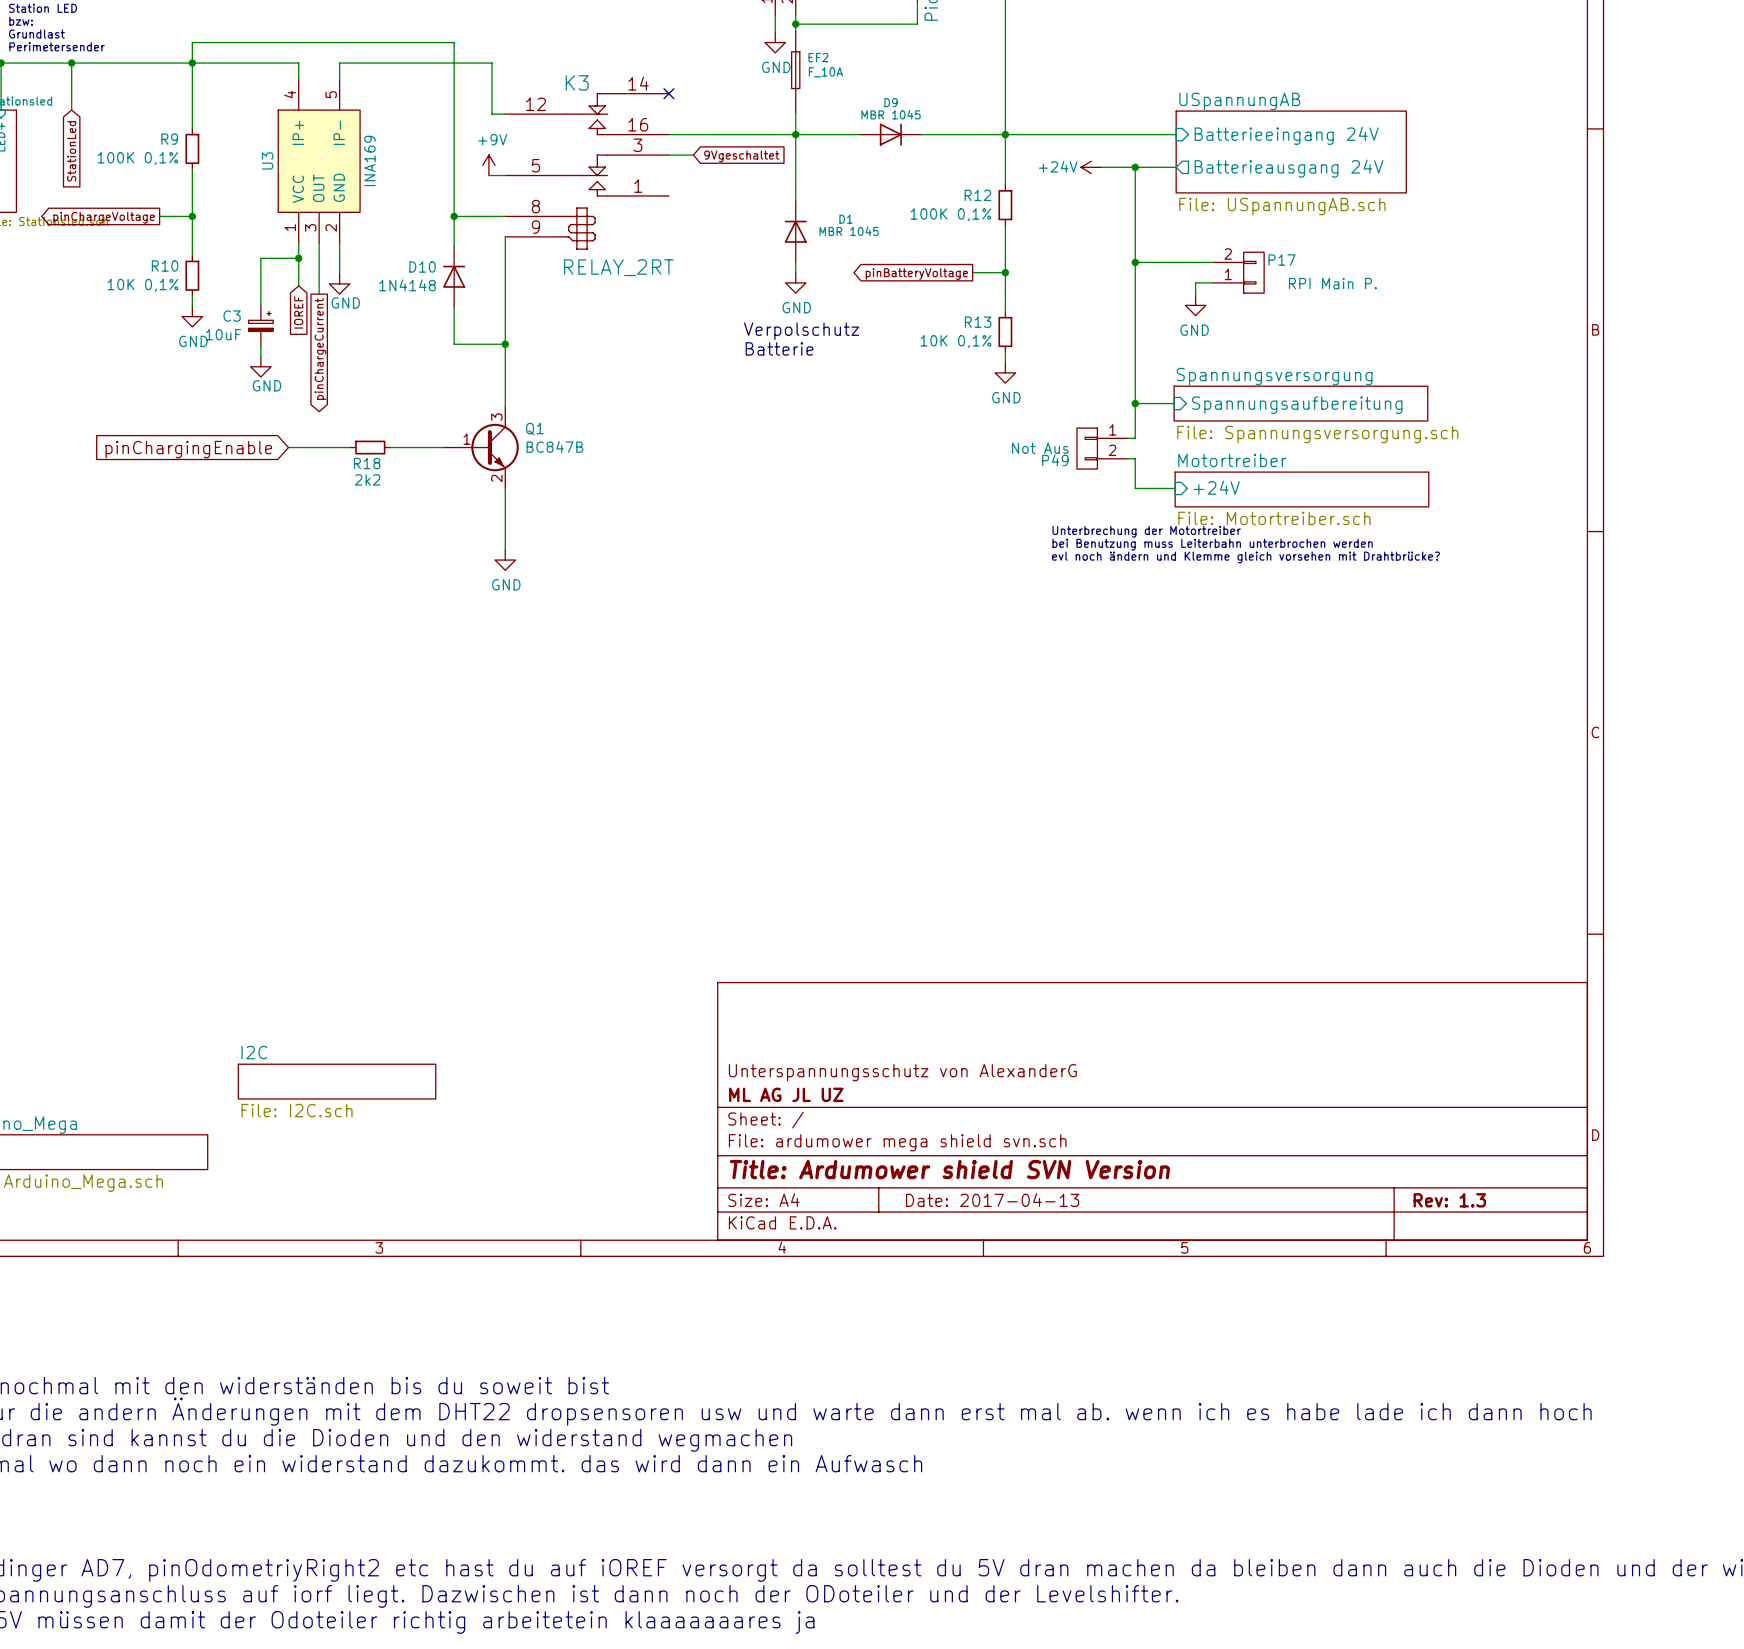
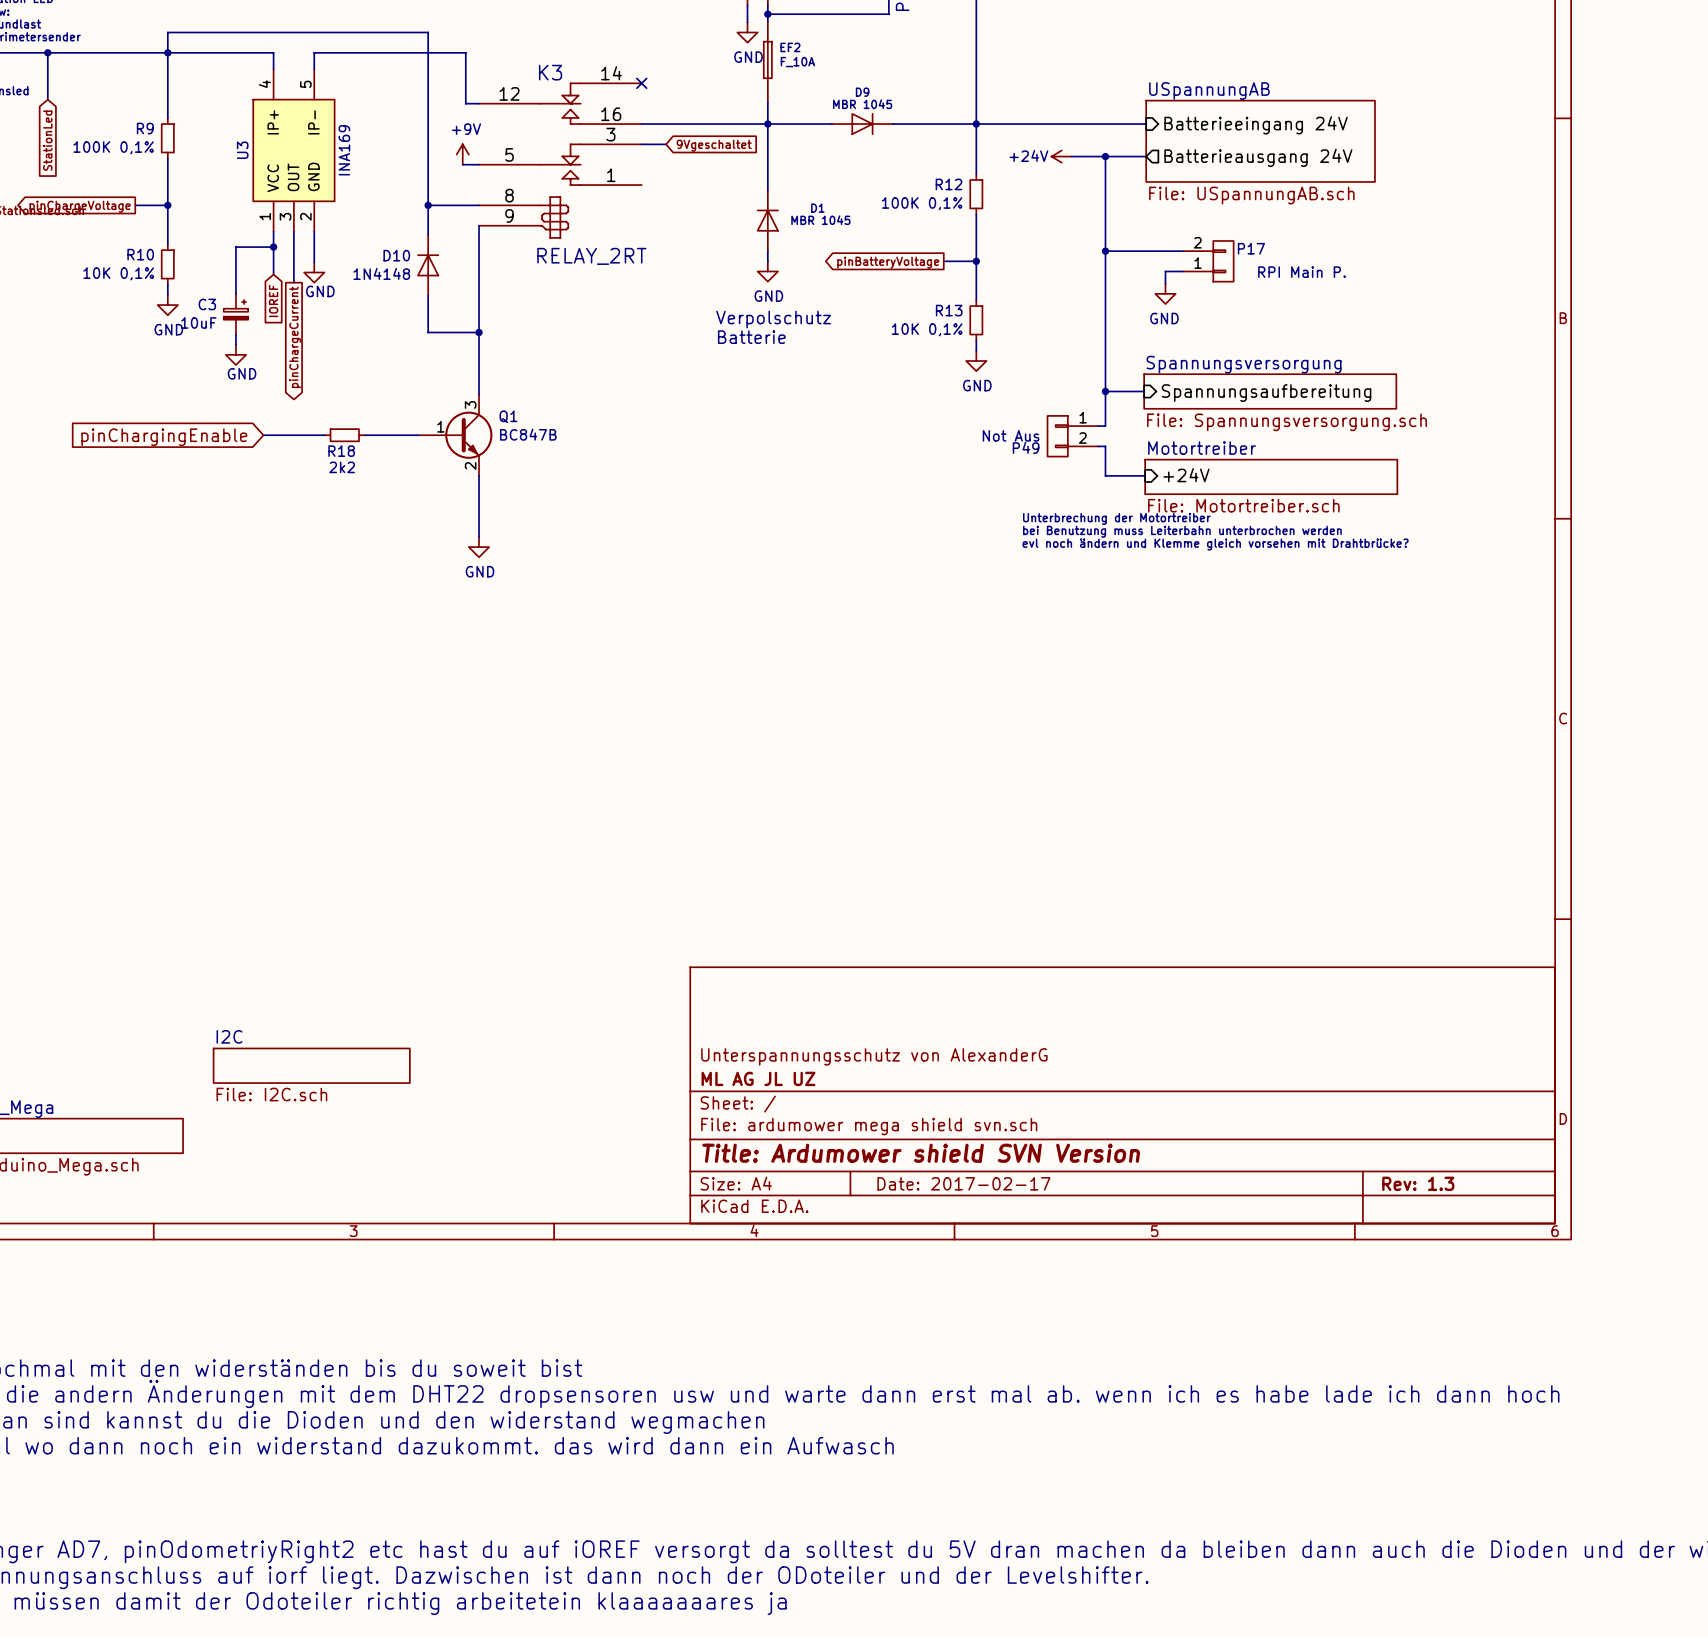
title block: Date: 2017-04-13 (992, 1200) -> Date: 2017-02-17 (963, 1183)

